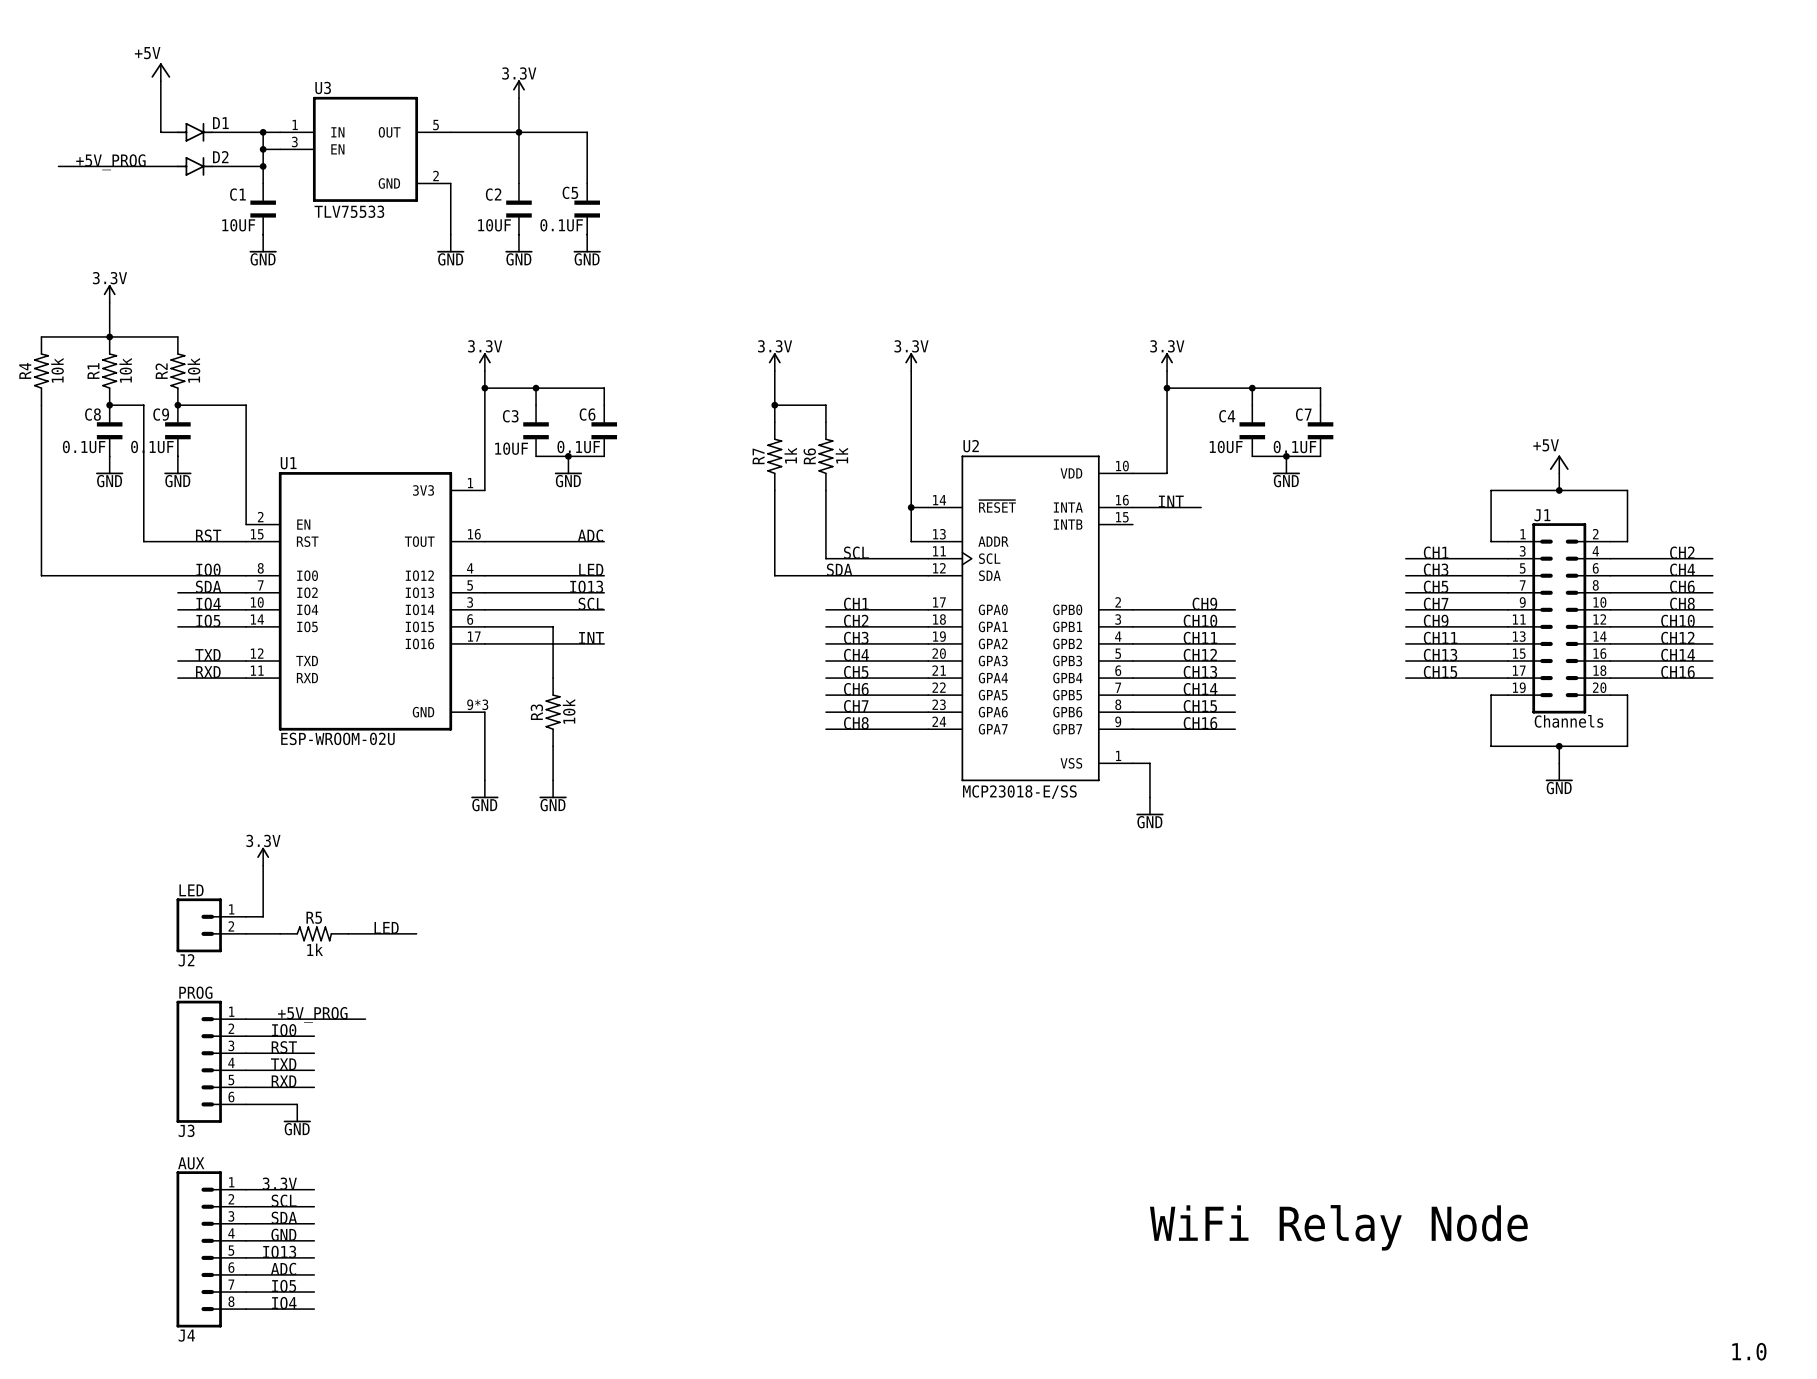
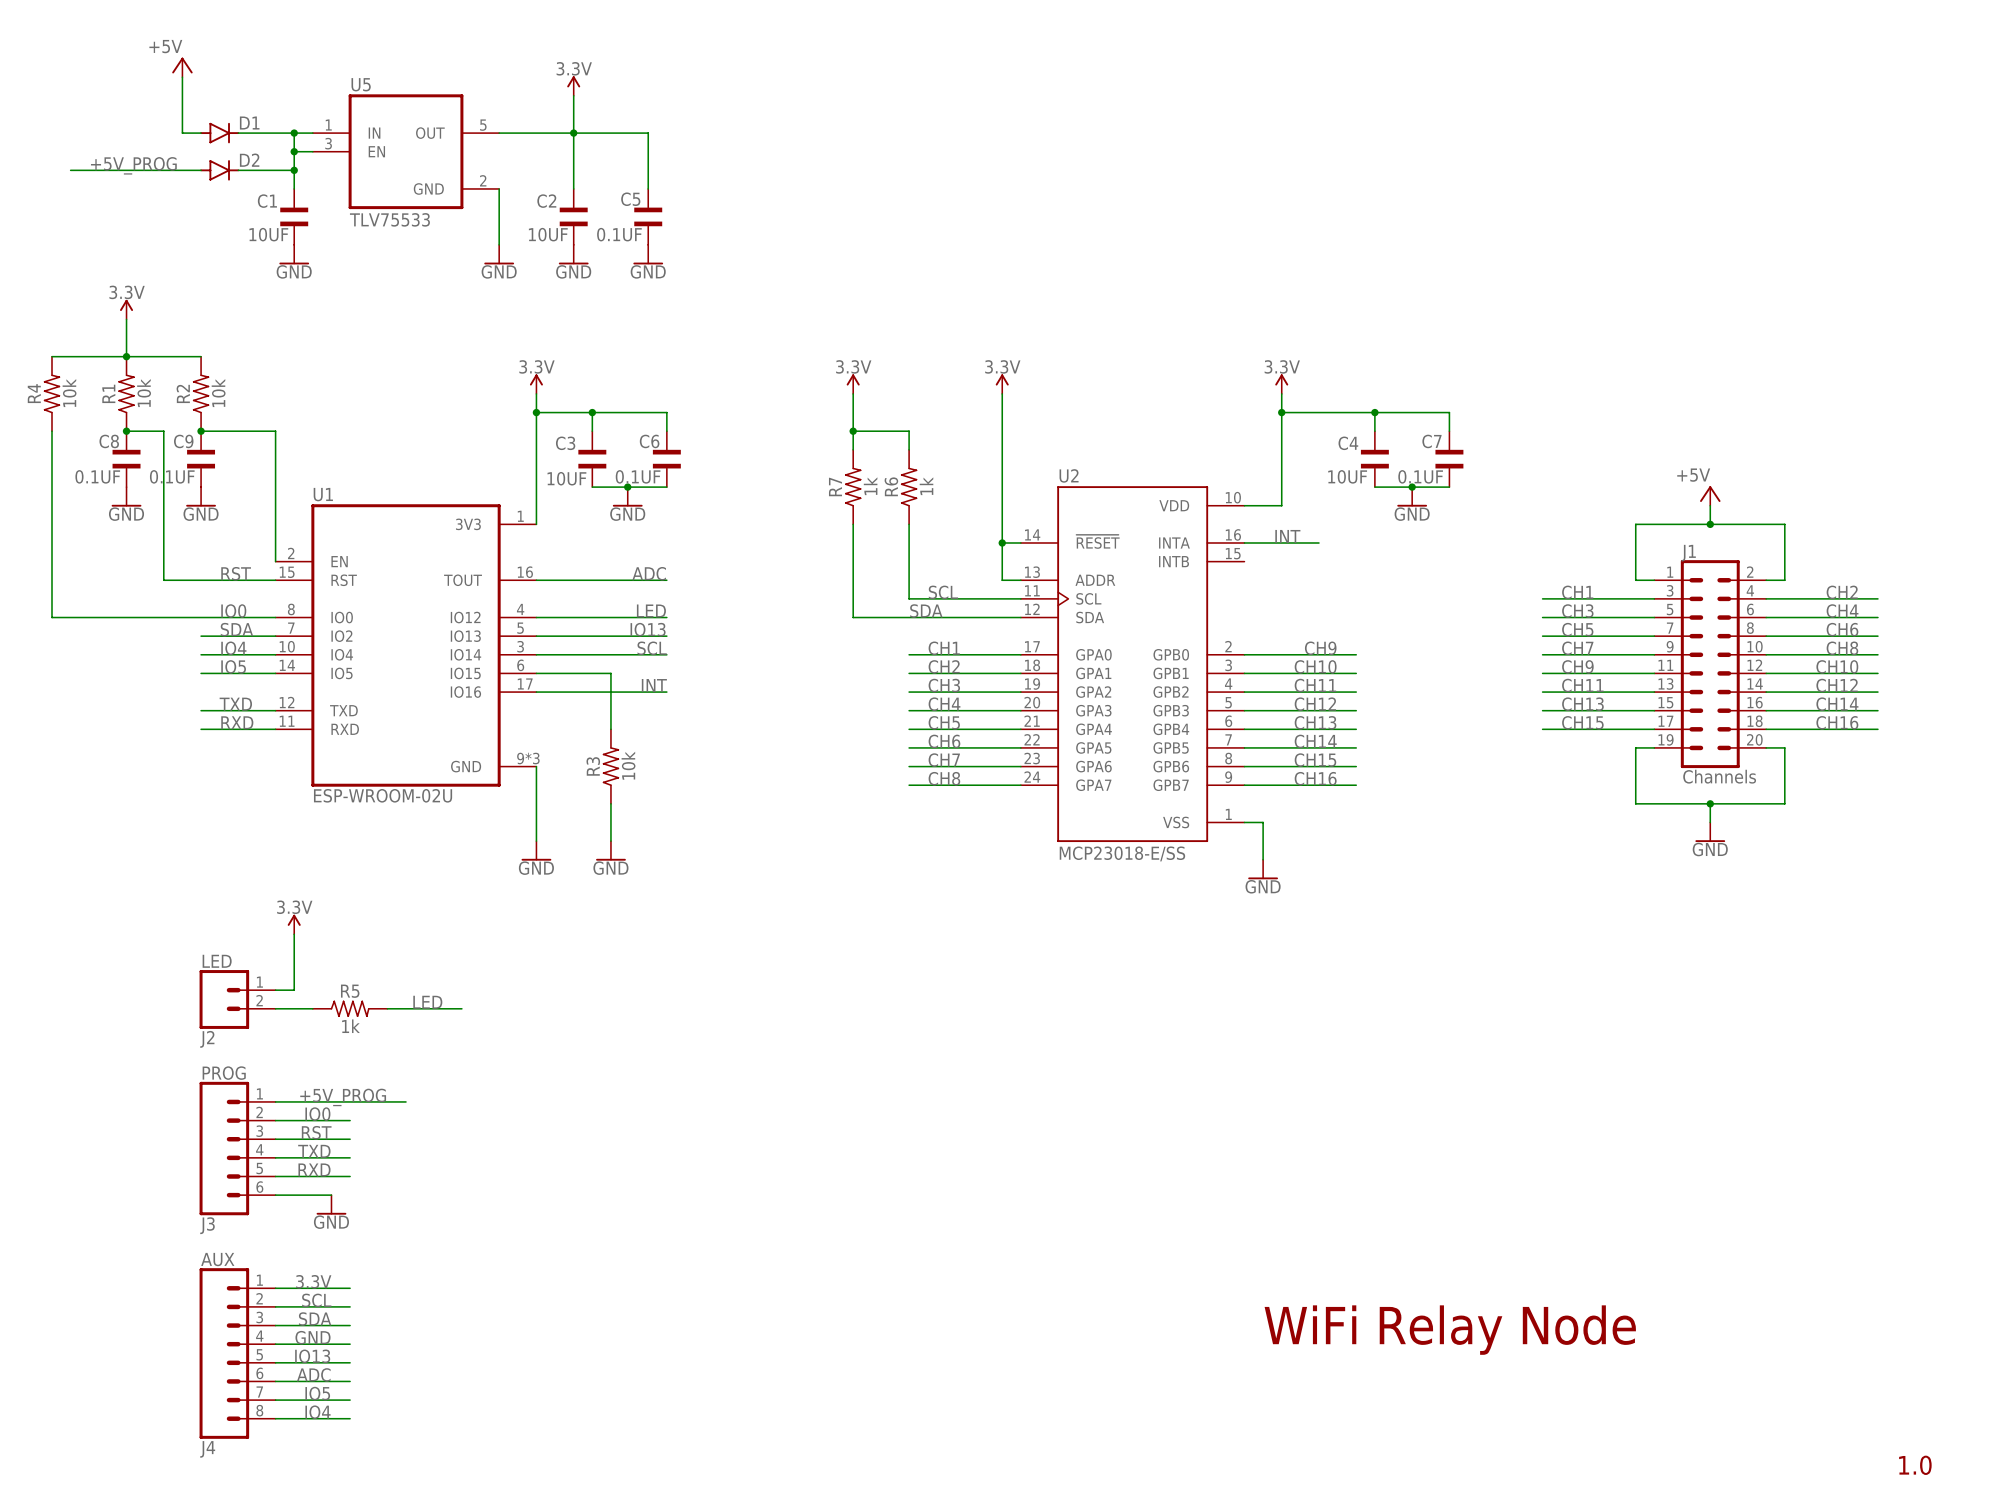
U3 name: U3 (323, 87) -> U5 (361, 84)

